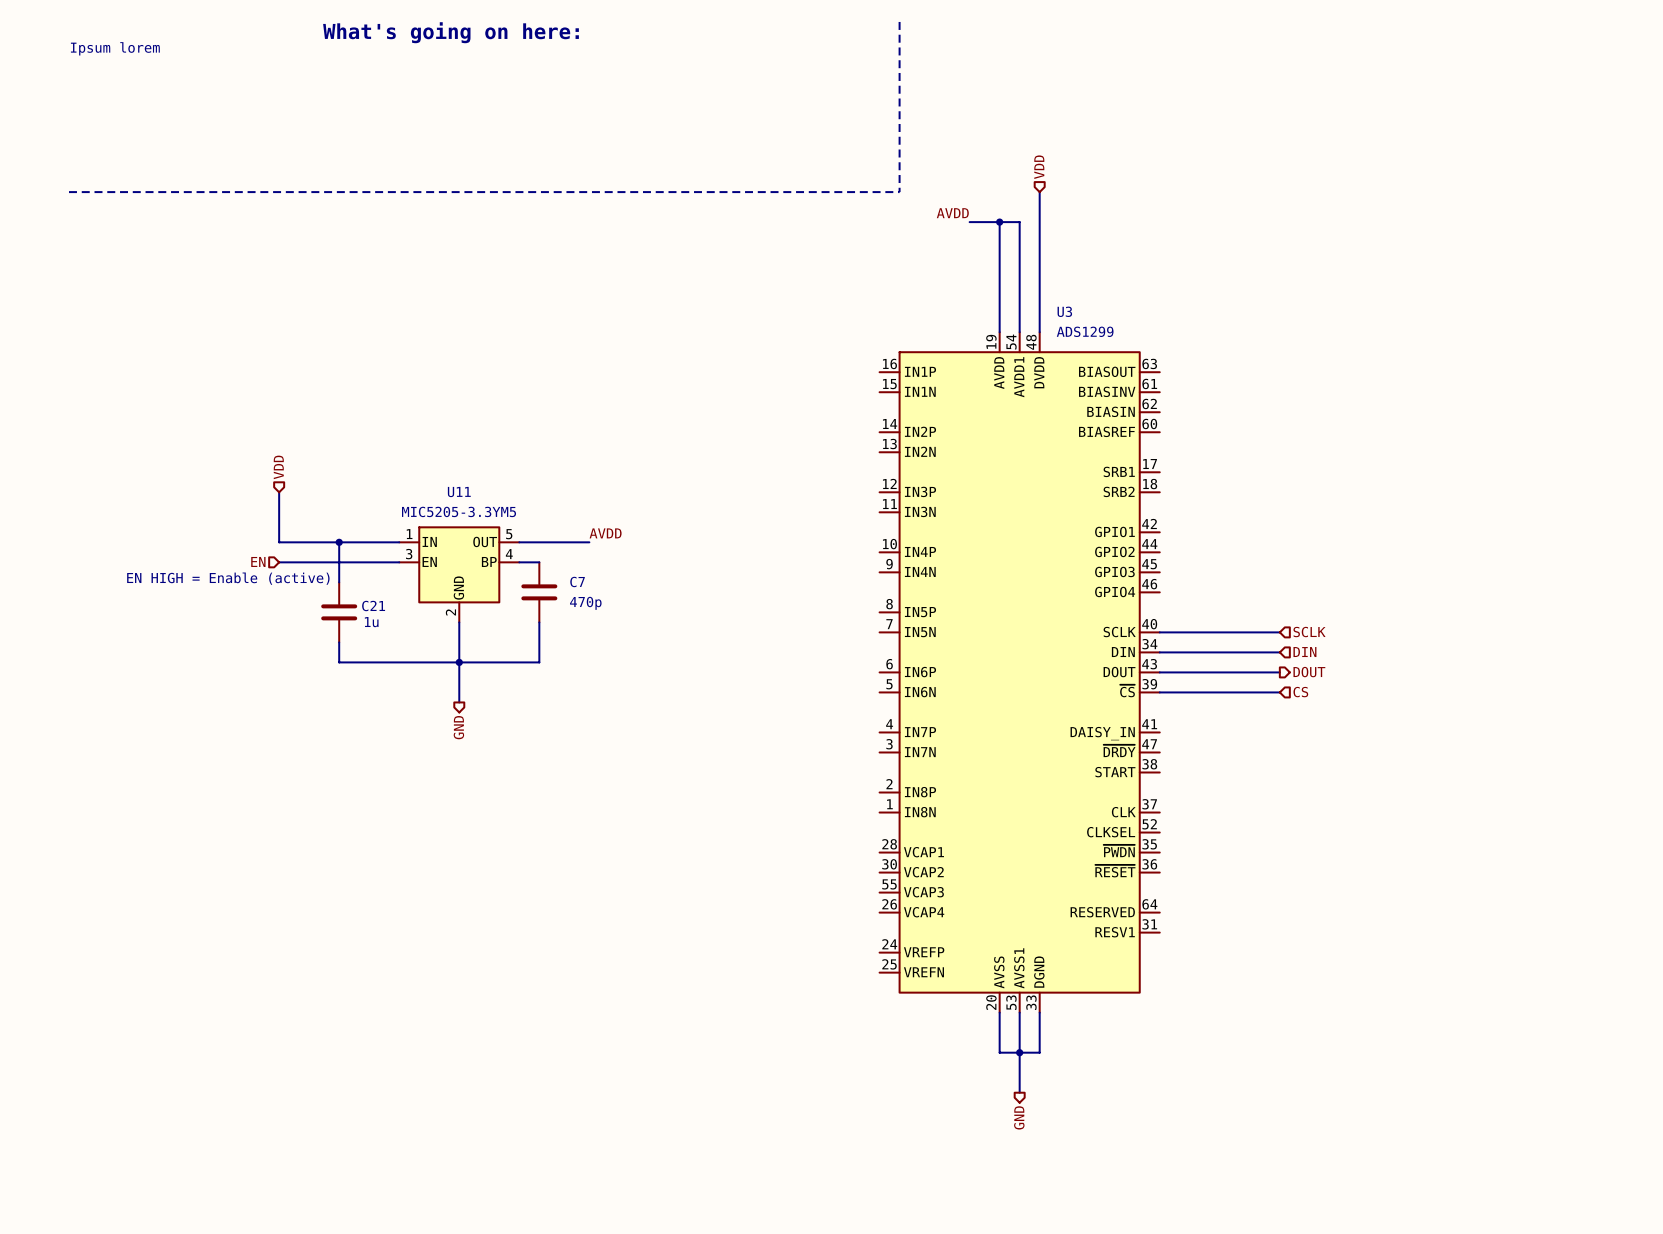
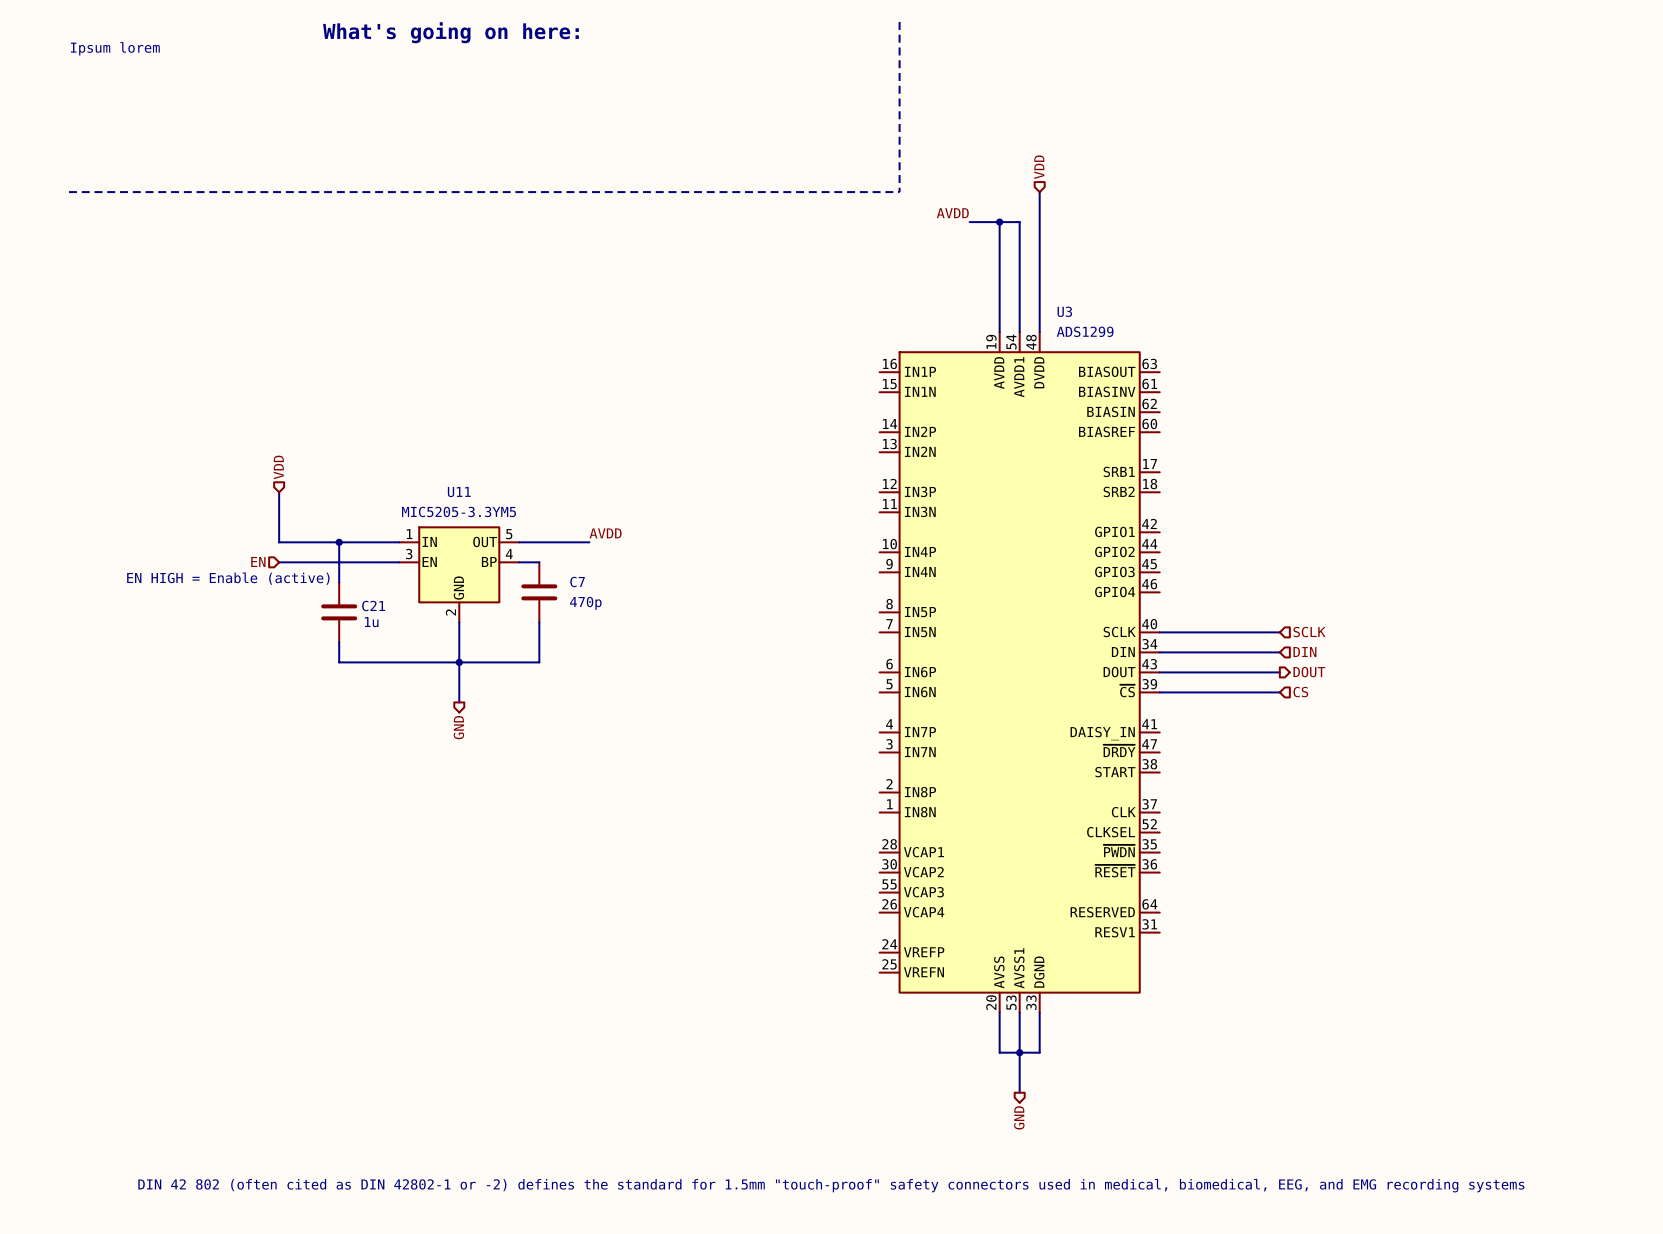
text: none -> DIN 42 802 (often cited as DIN 42802-1 or -2) defines the standard for 1.5mm "touch-proof" safety connectors used in medical, biomedical, EEG, and EMG recording systems (831, 1185)

